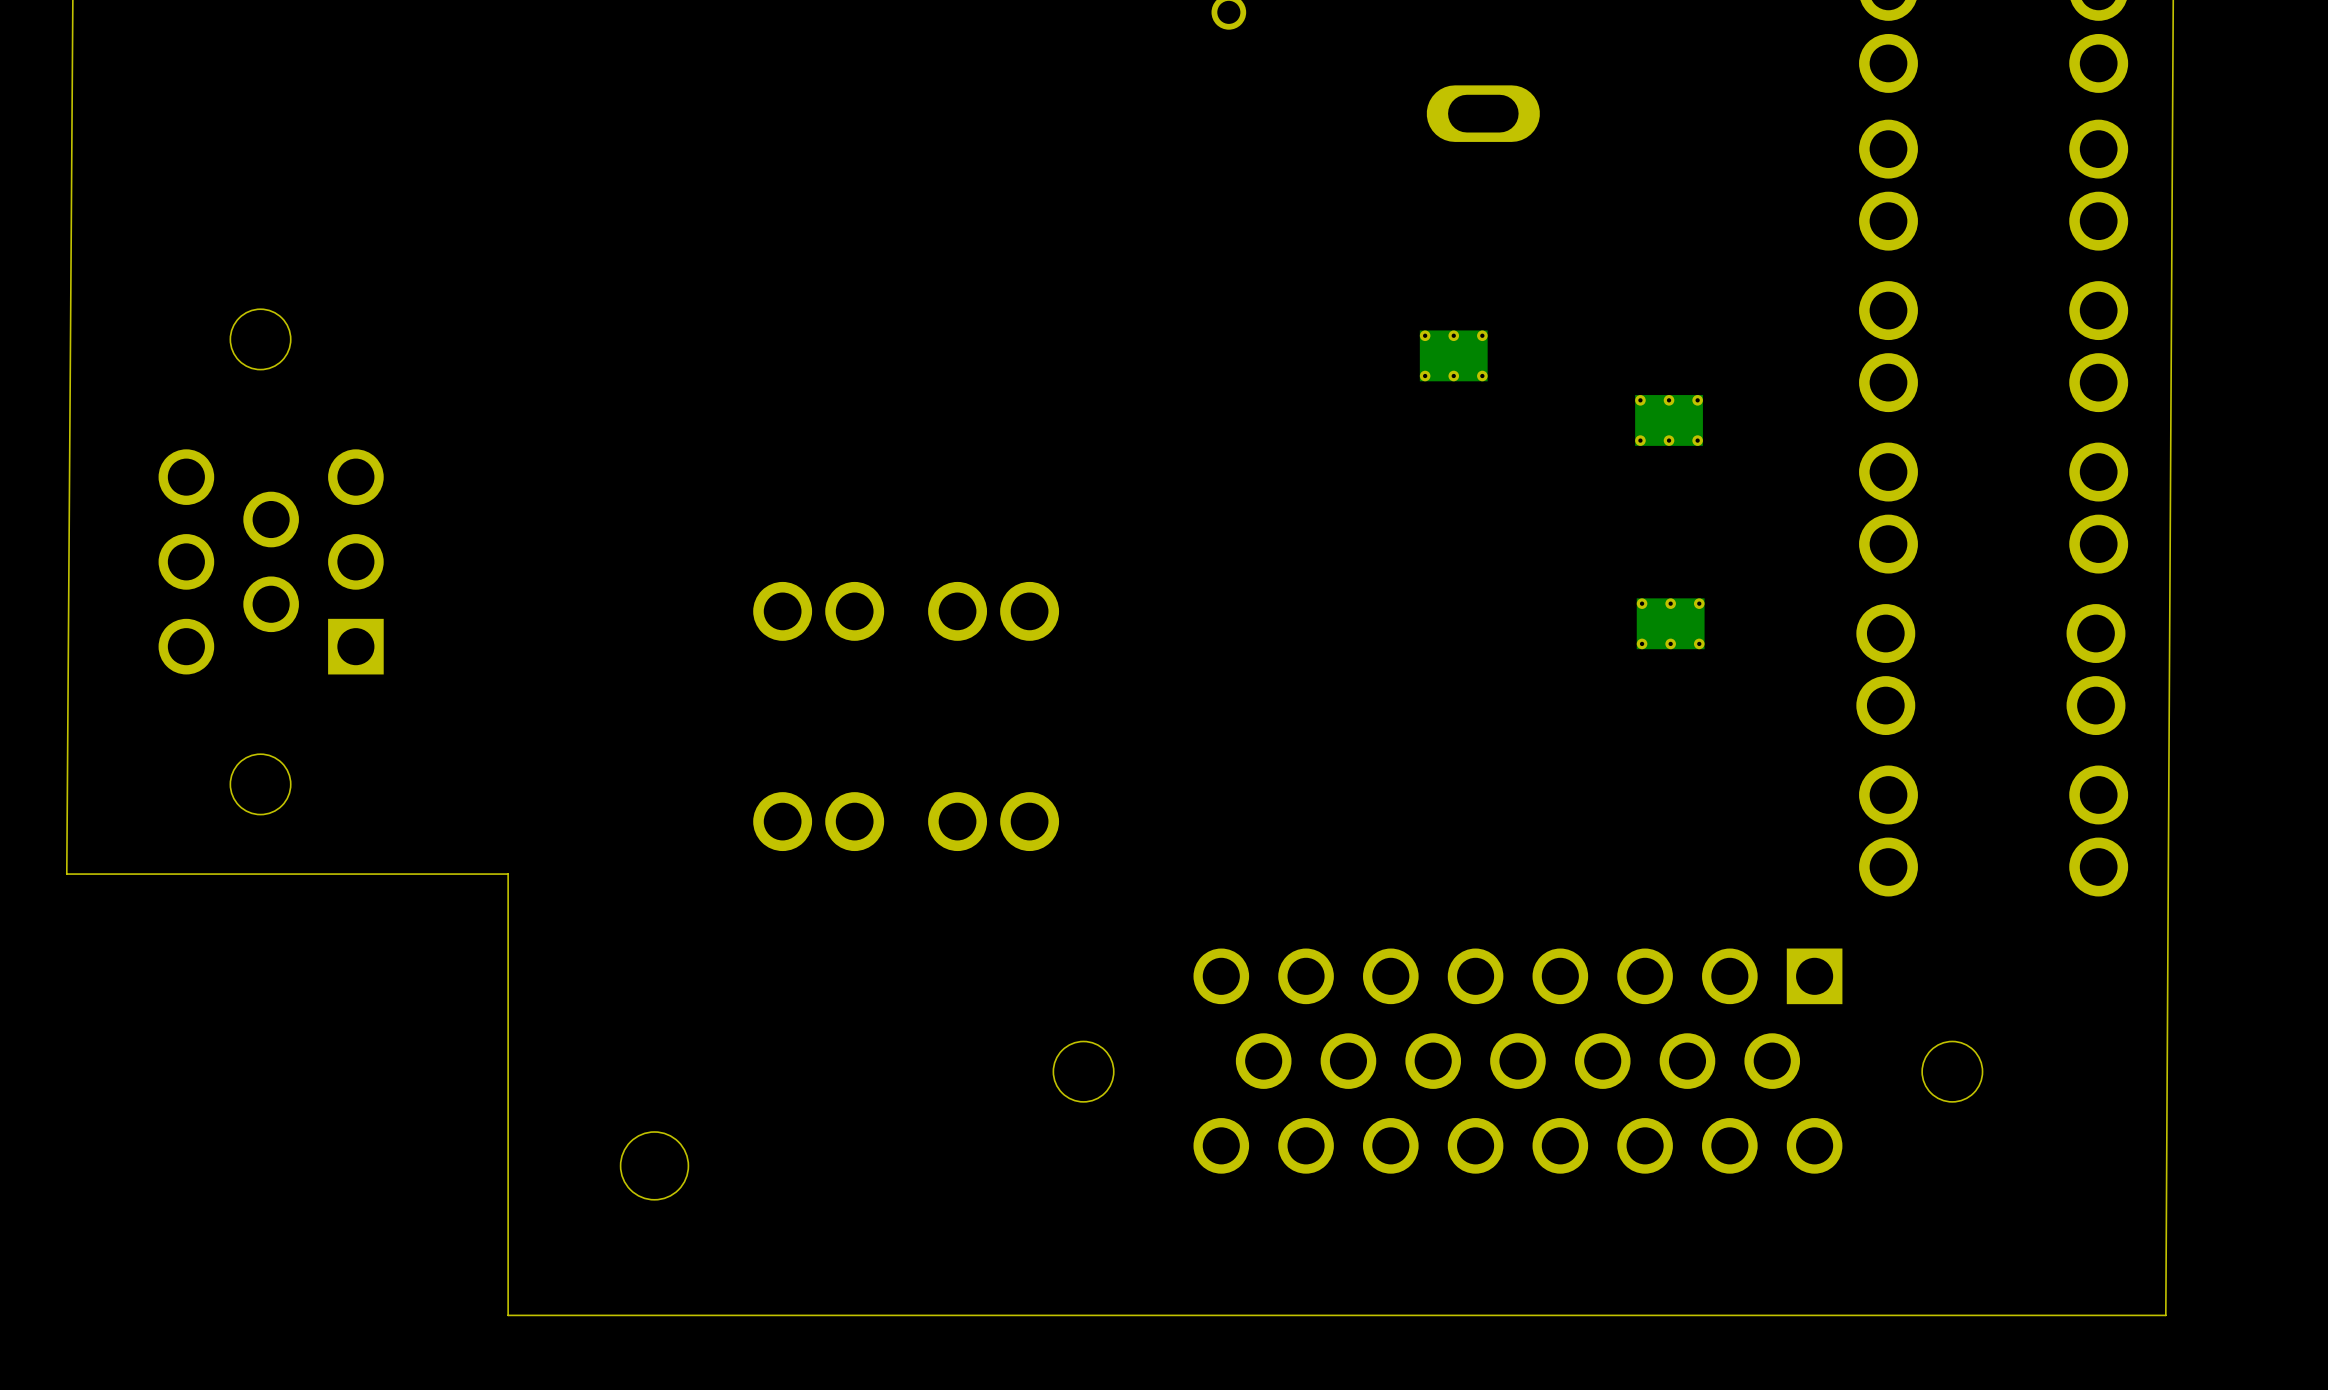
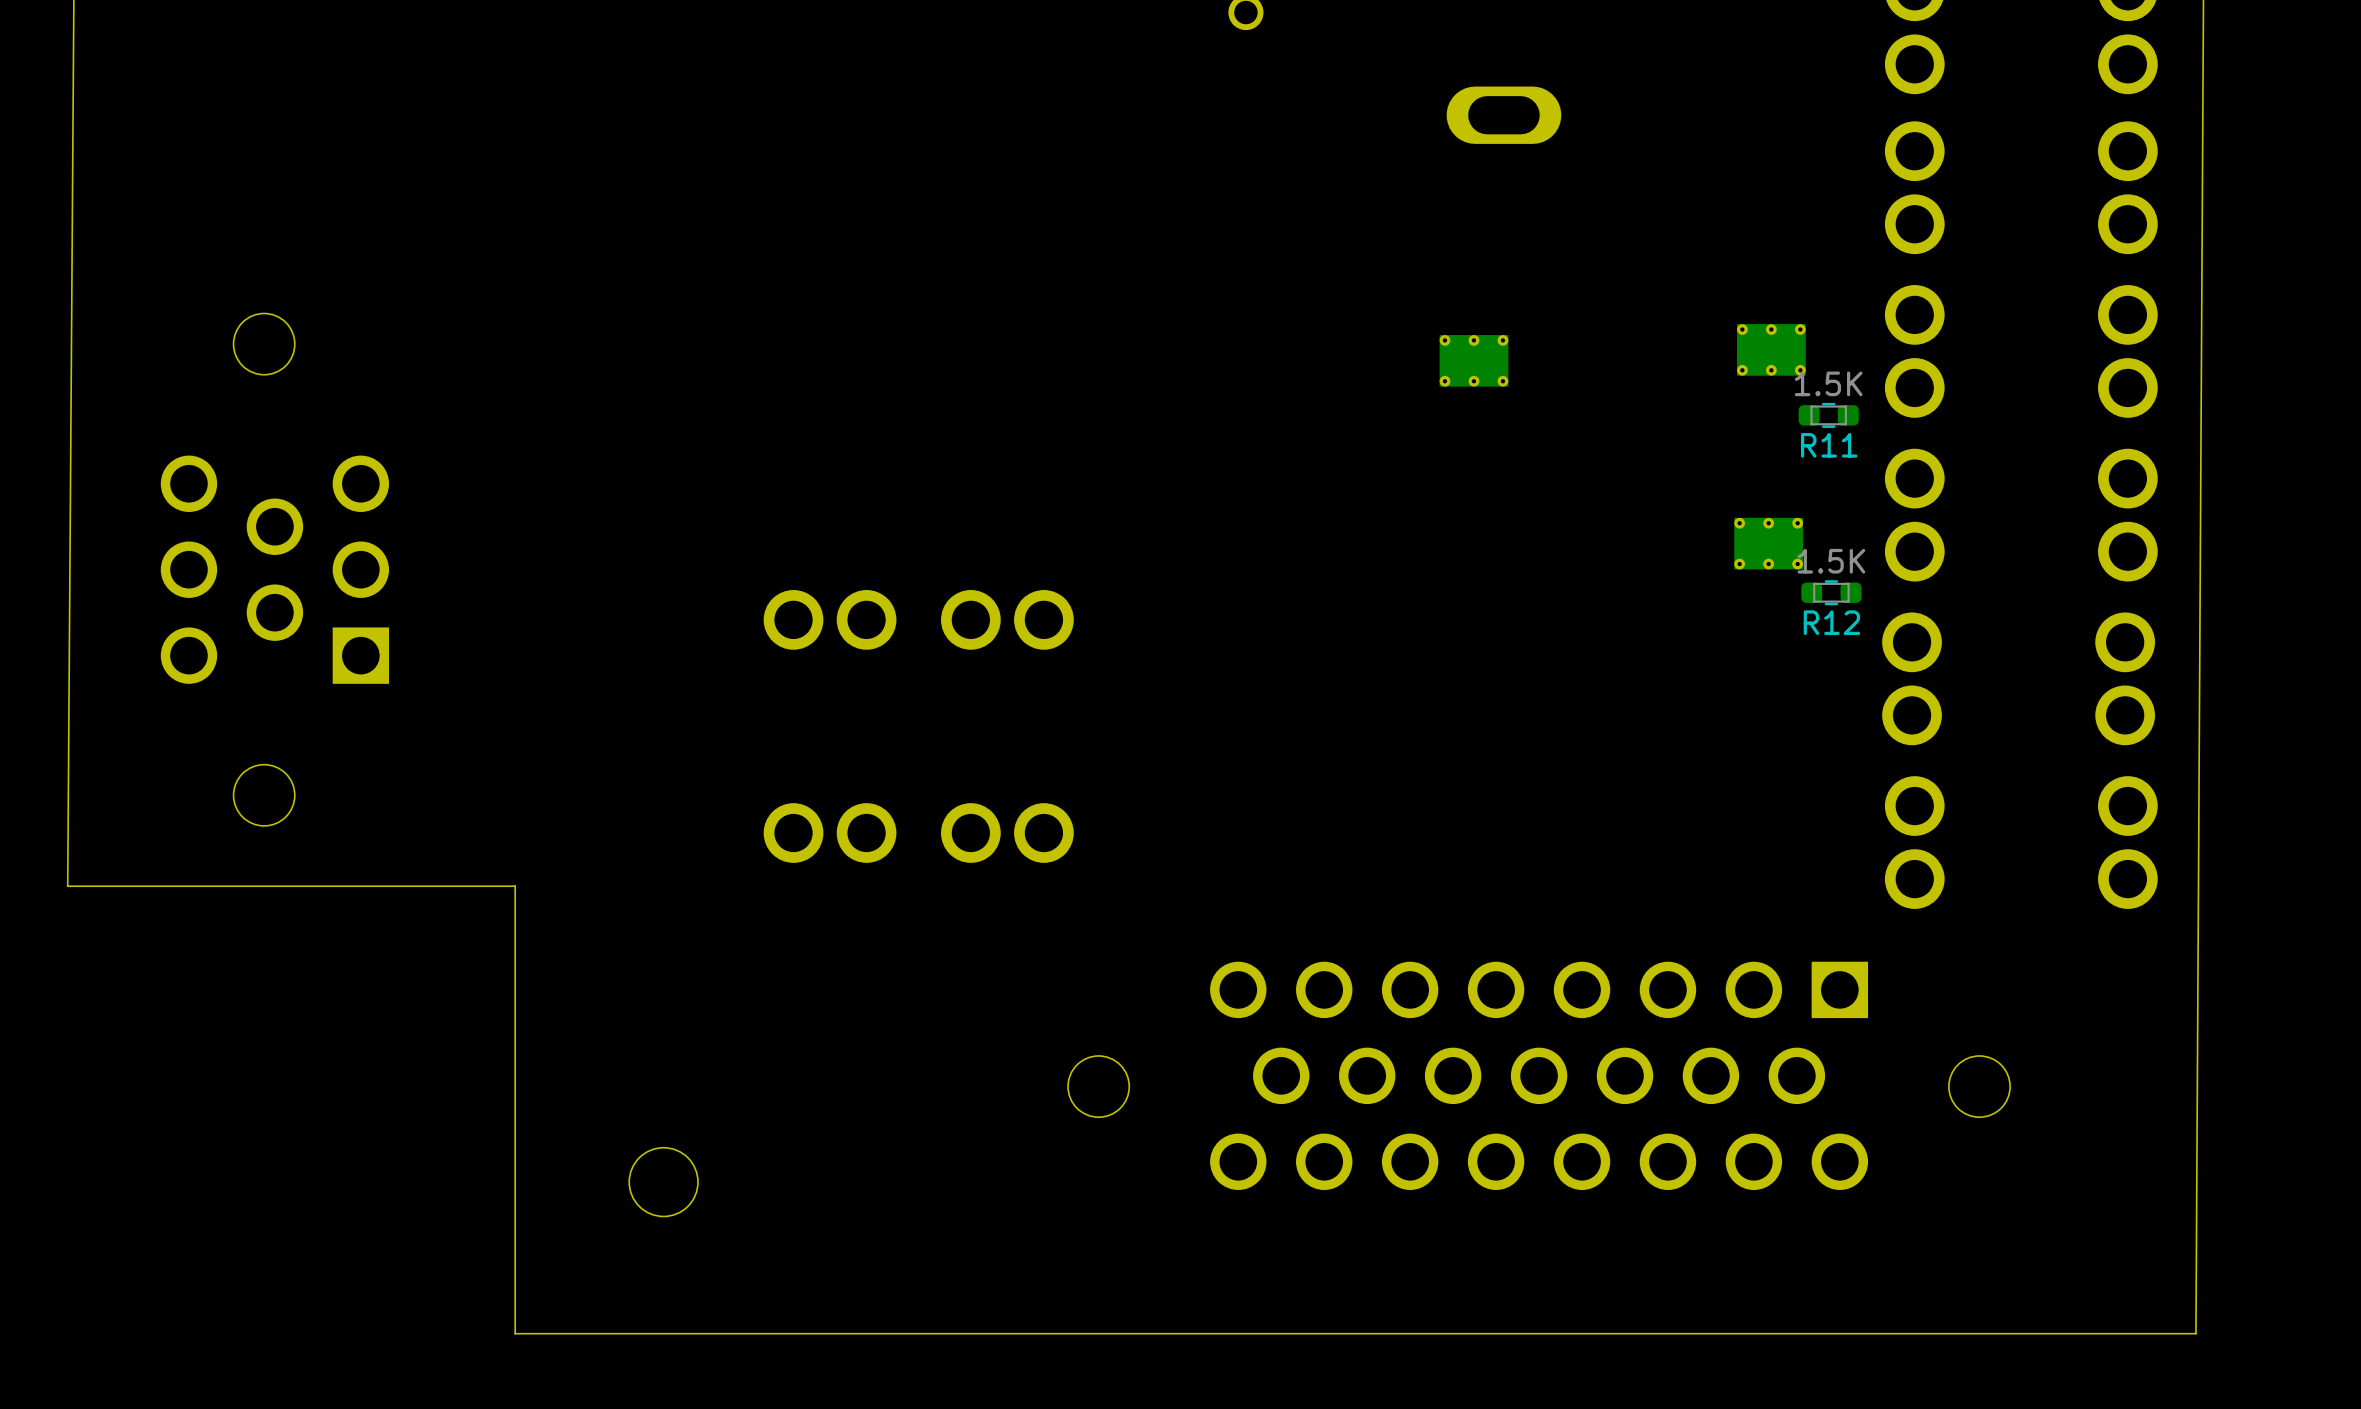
part: none -> (1771, 349)
R11: none -> 1.5K (1828, 415)
part: (1669, 420) -> none
part: none -> (1768, 543)
R12: none -> 1.5K (1831, 592)
part: (1670, 623) -> none

